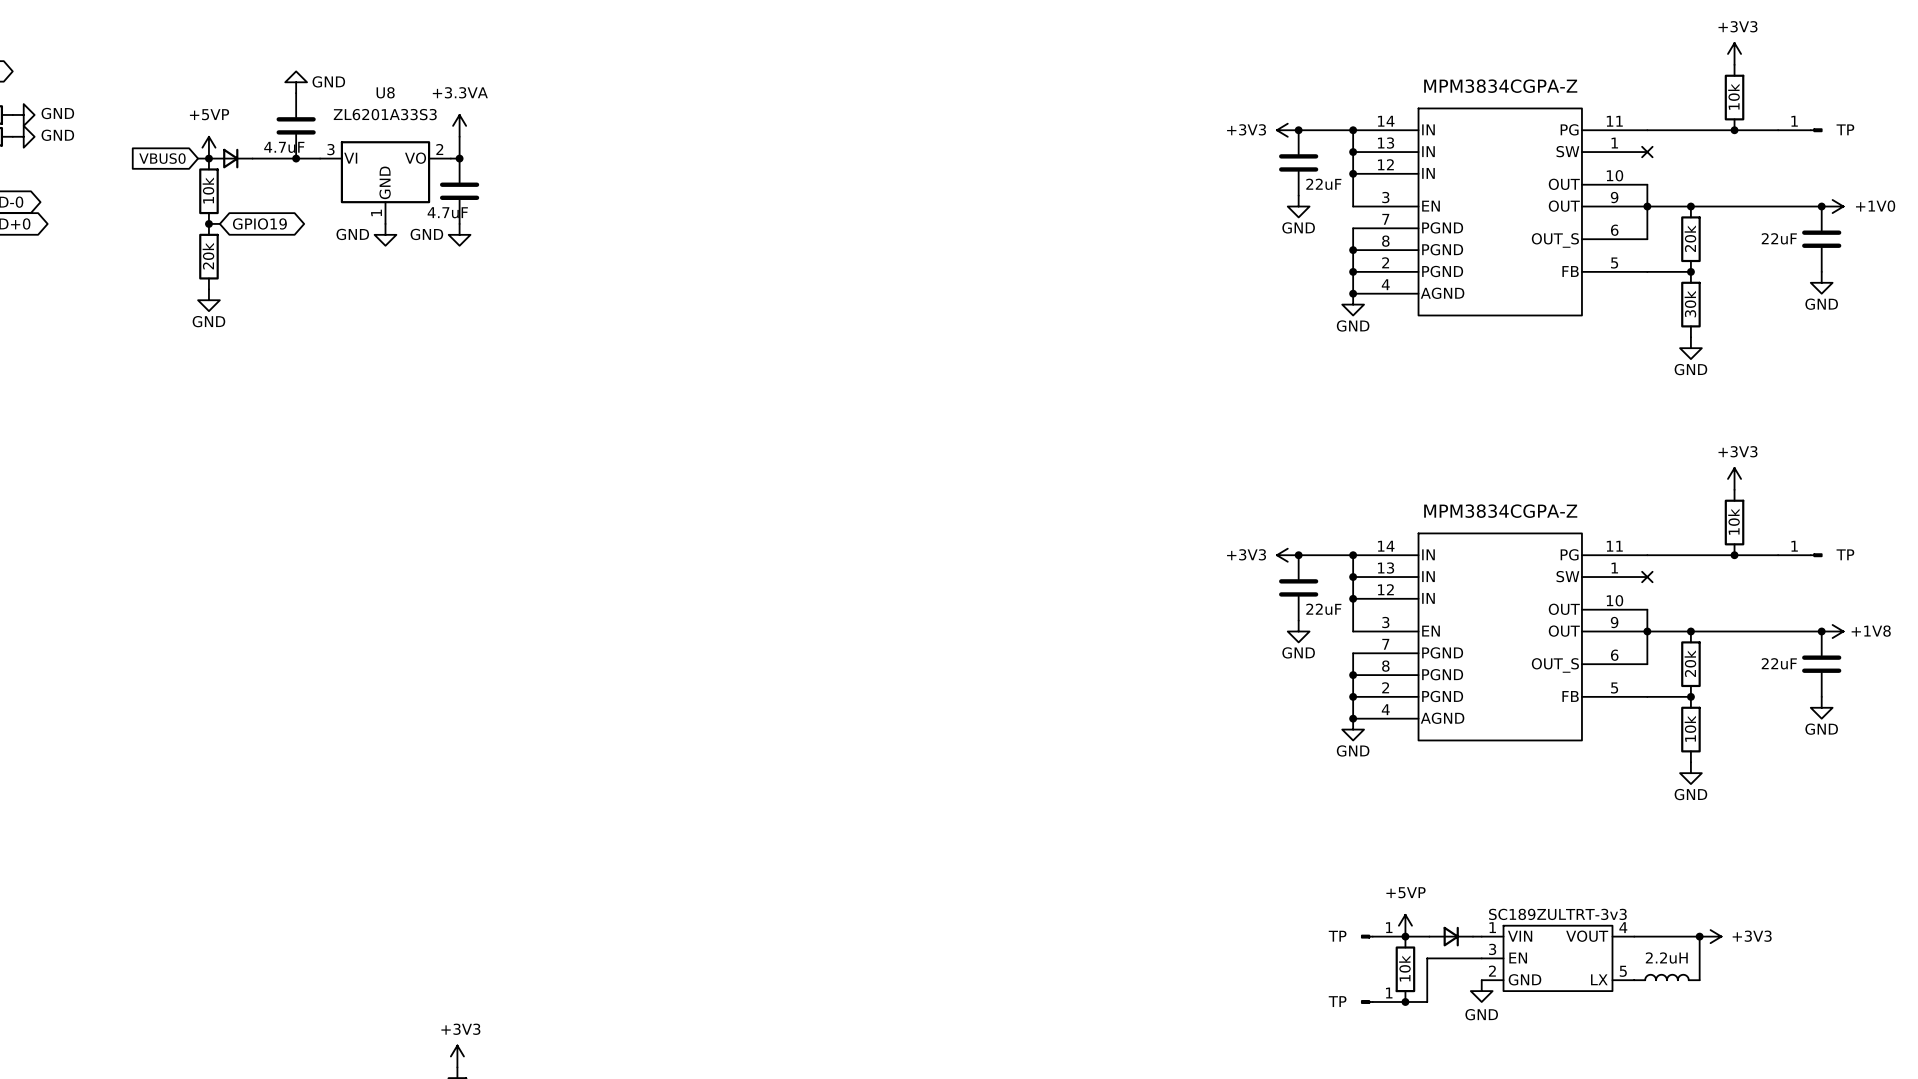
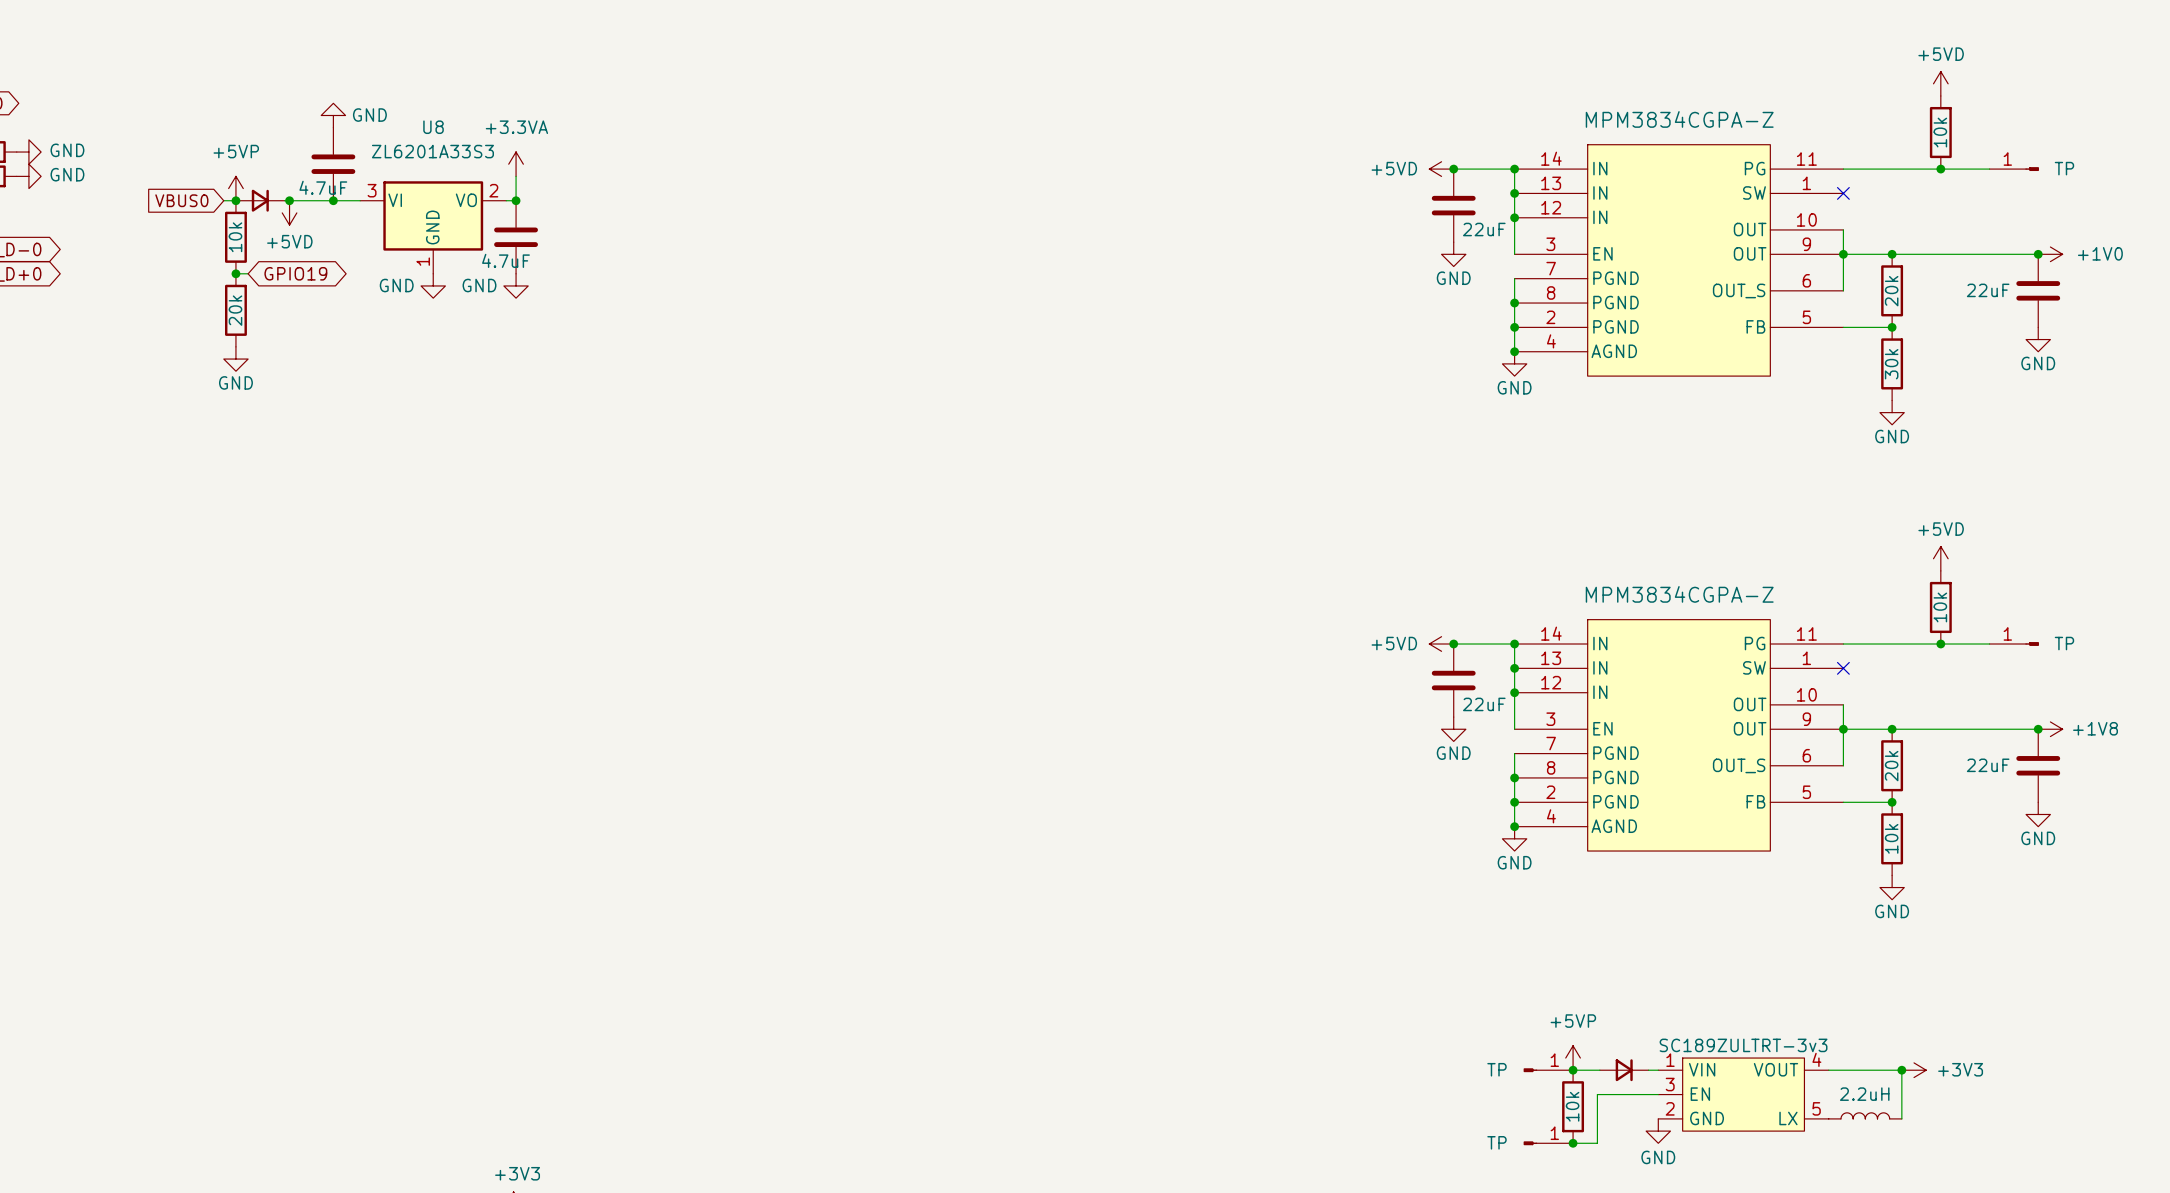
power symbol: +3V3 (1734, 53) -> +5VD (1940, 83)
power symbol: +3V3 (1287, 130) -> +5VD (1441, 169)
junction: none -> (289, 200)
power symbol: none -> +5VD (289, 212)
power symbol: +3V3 (1734, 478) -> +5VD (1940, 558)
power symbol: +3V3 (1287, 555) -> +5VD (1441, 644)

